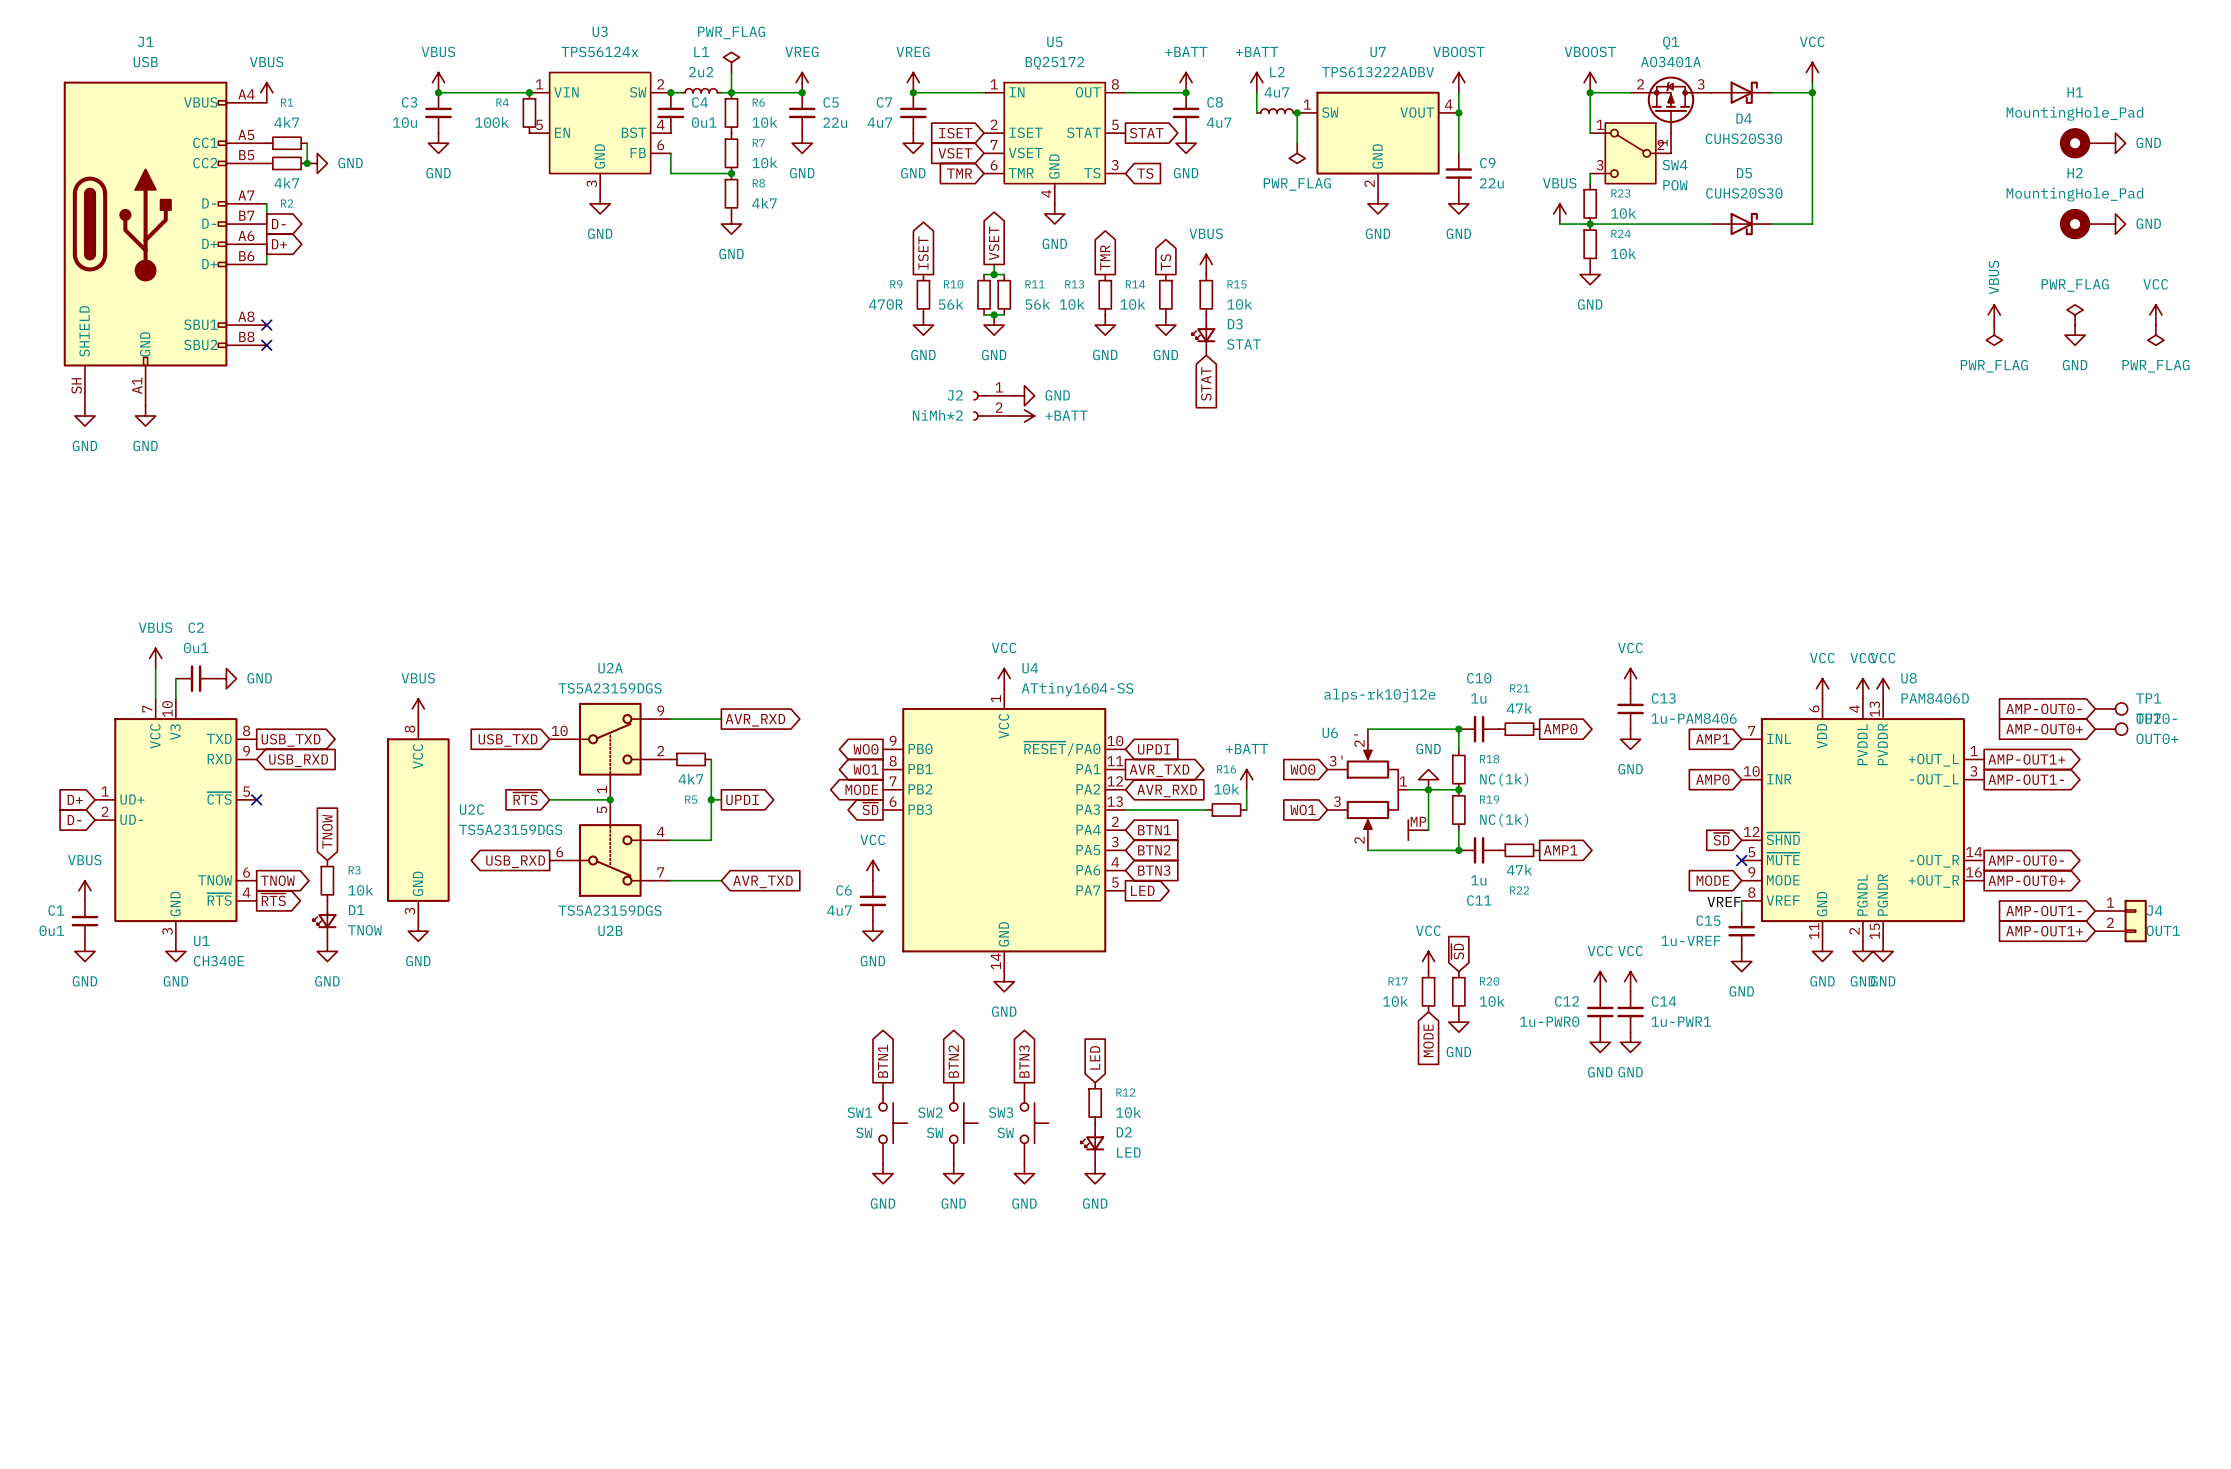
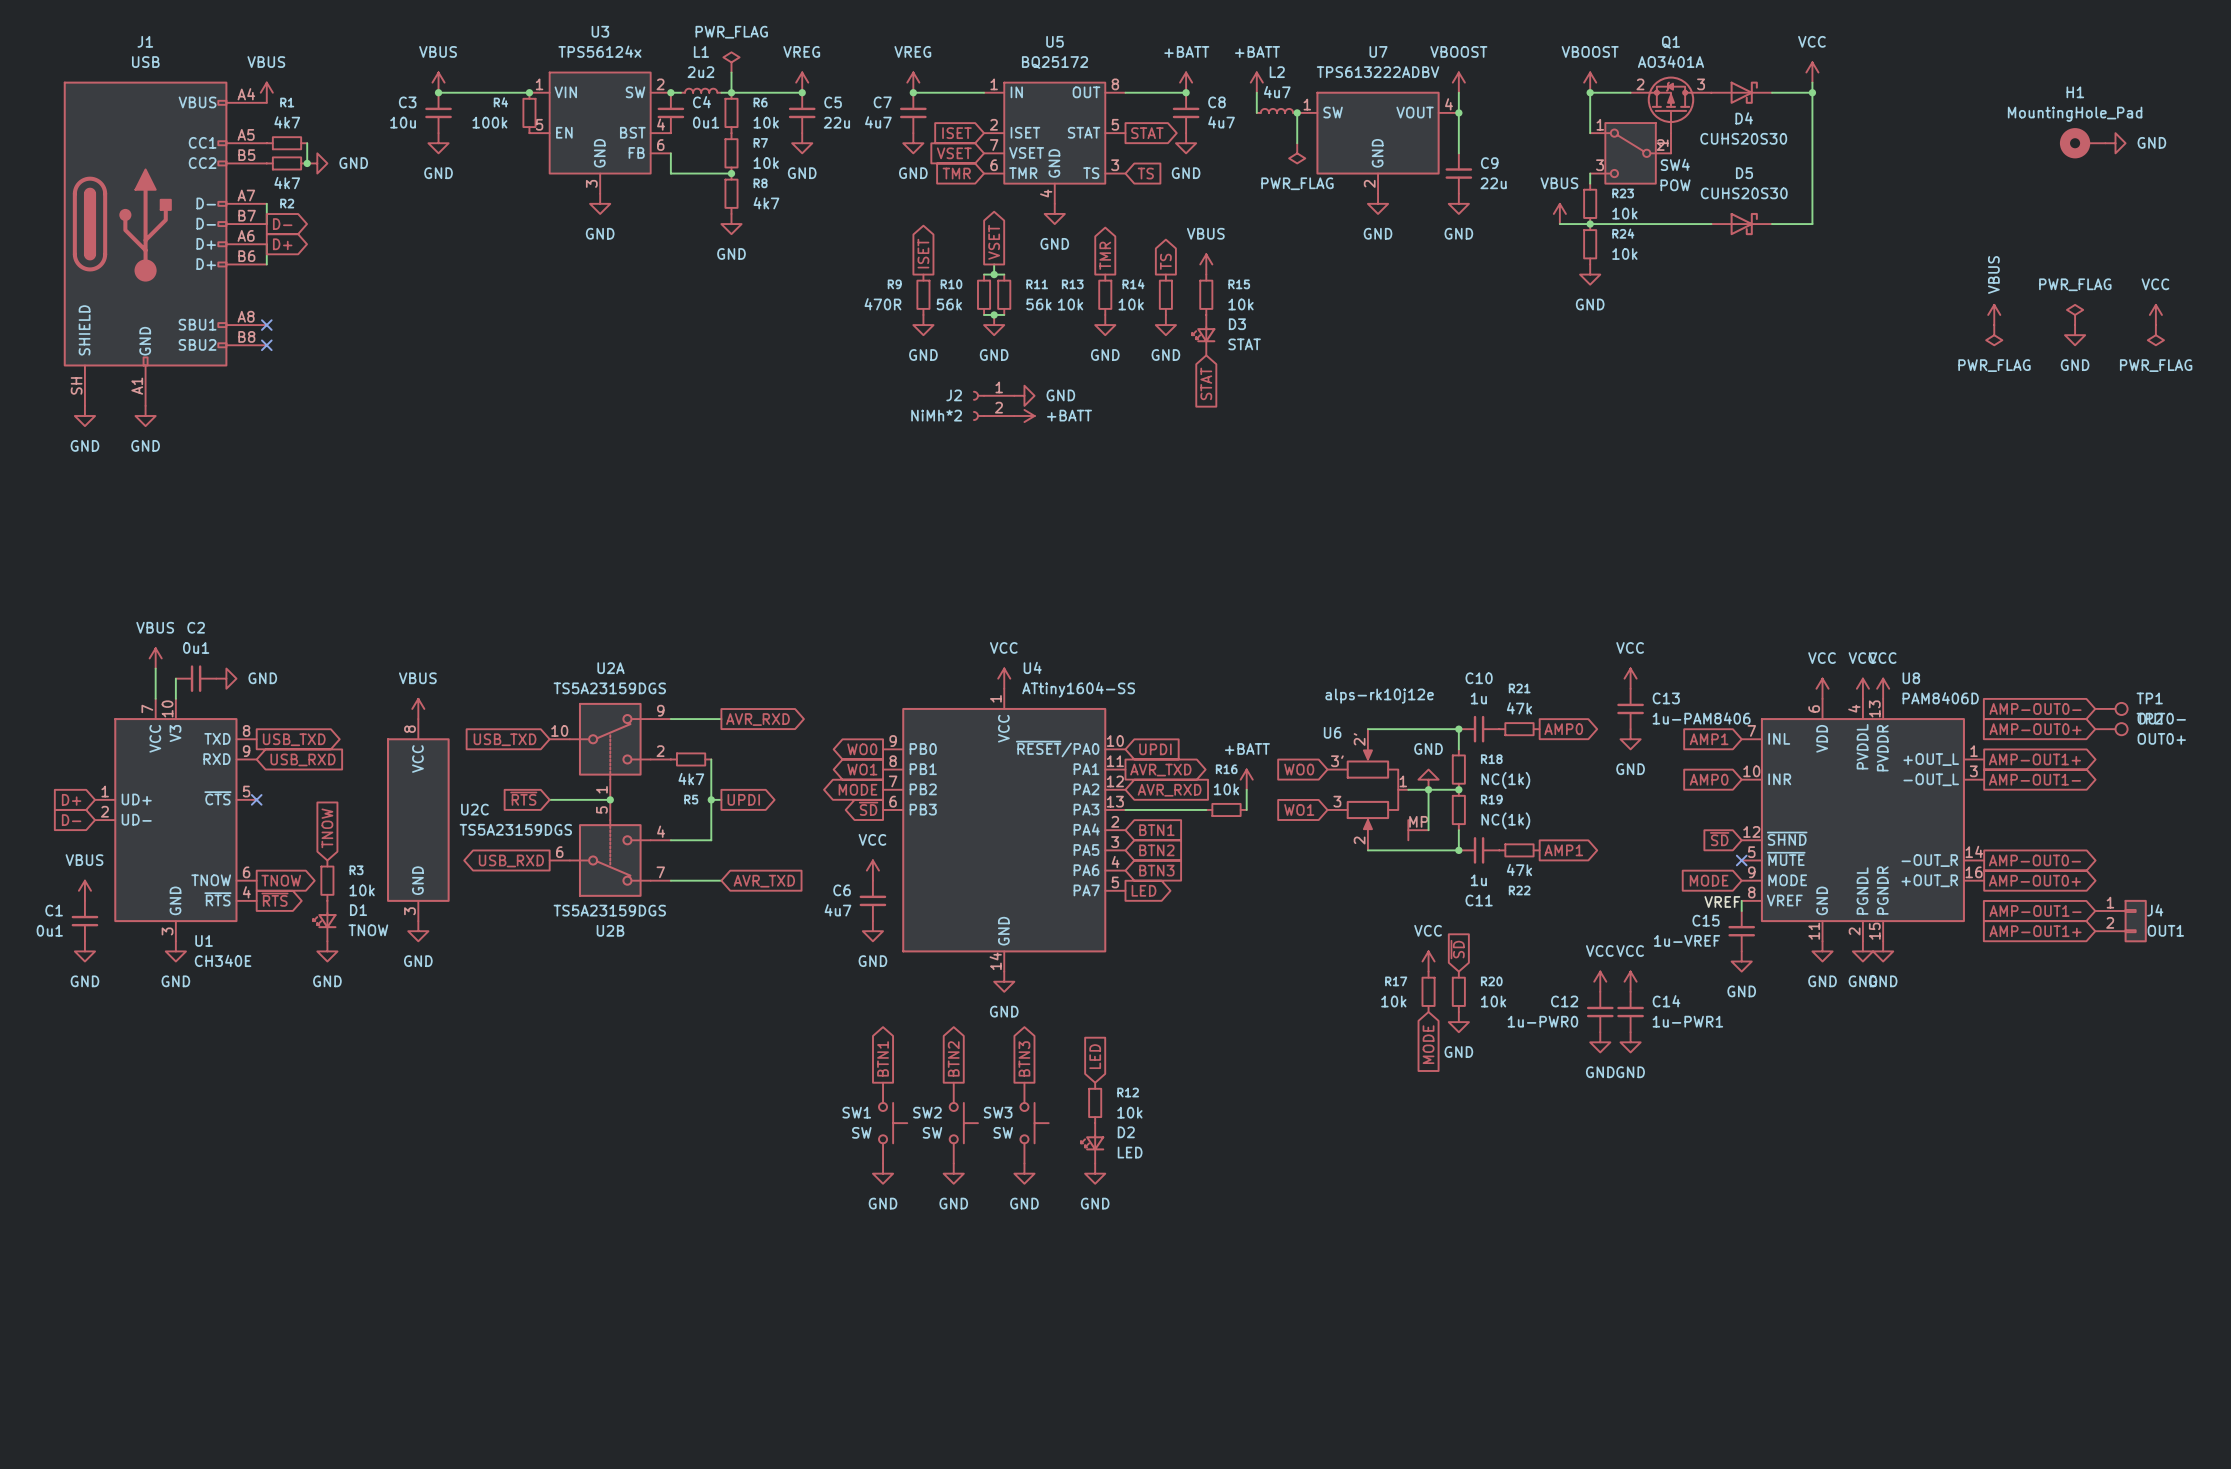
H2: MountingHole_Pad (2082, 224) -> none
power symbol: GND (2115, 224) -> none

